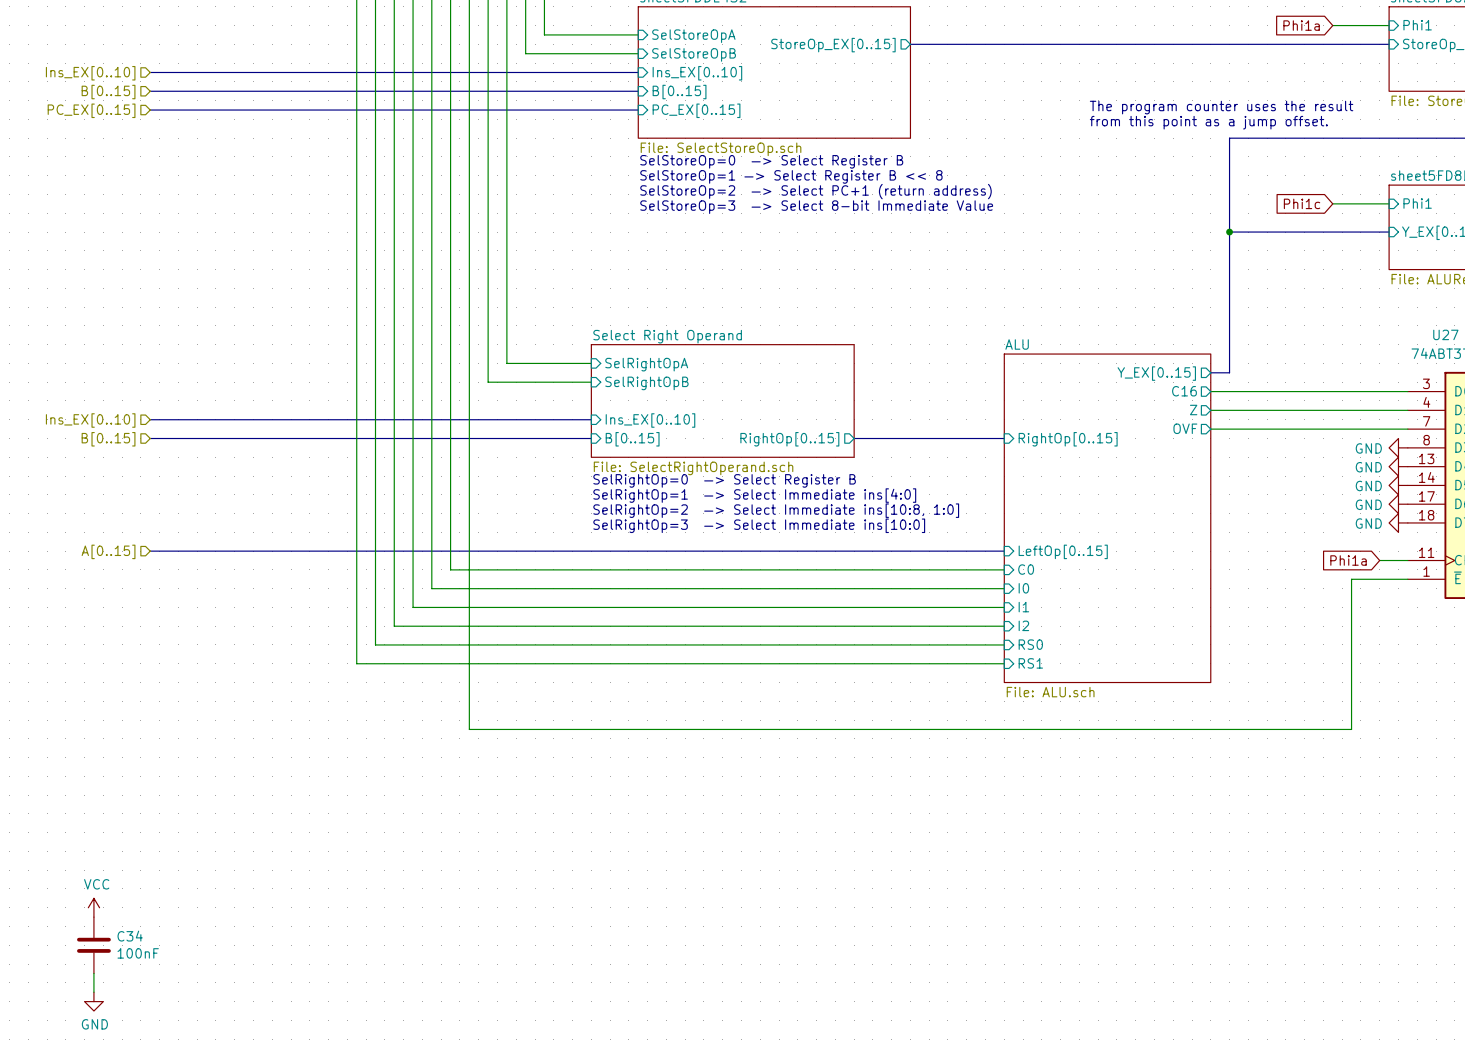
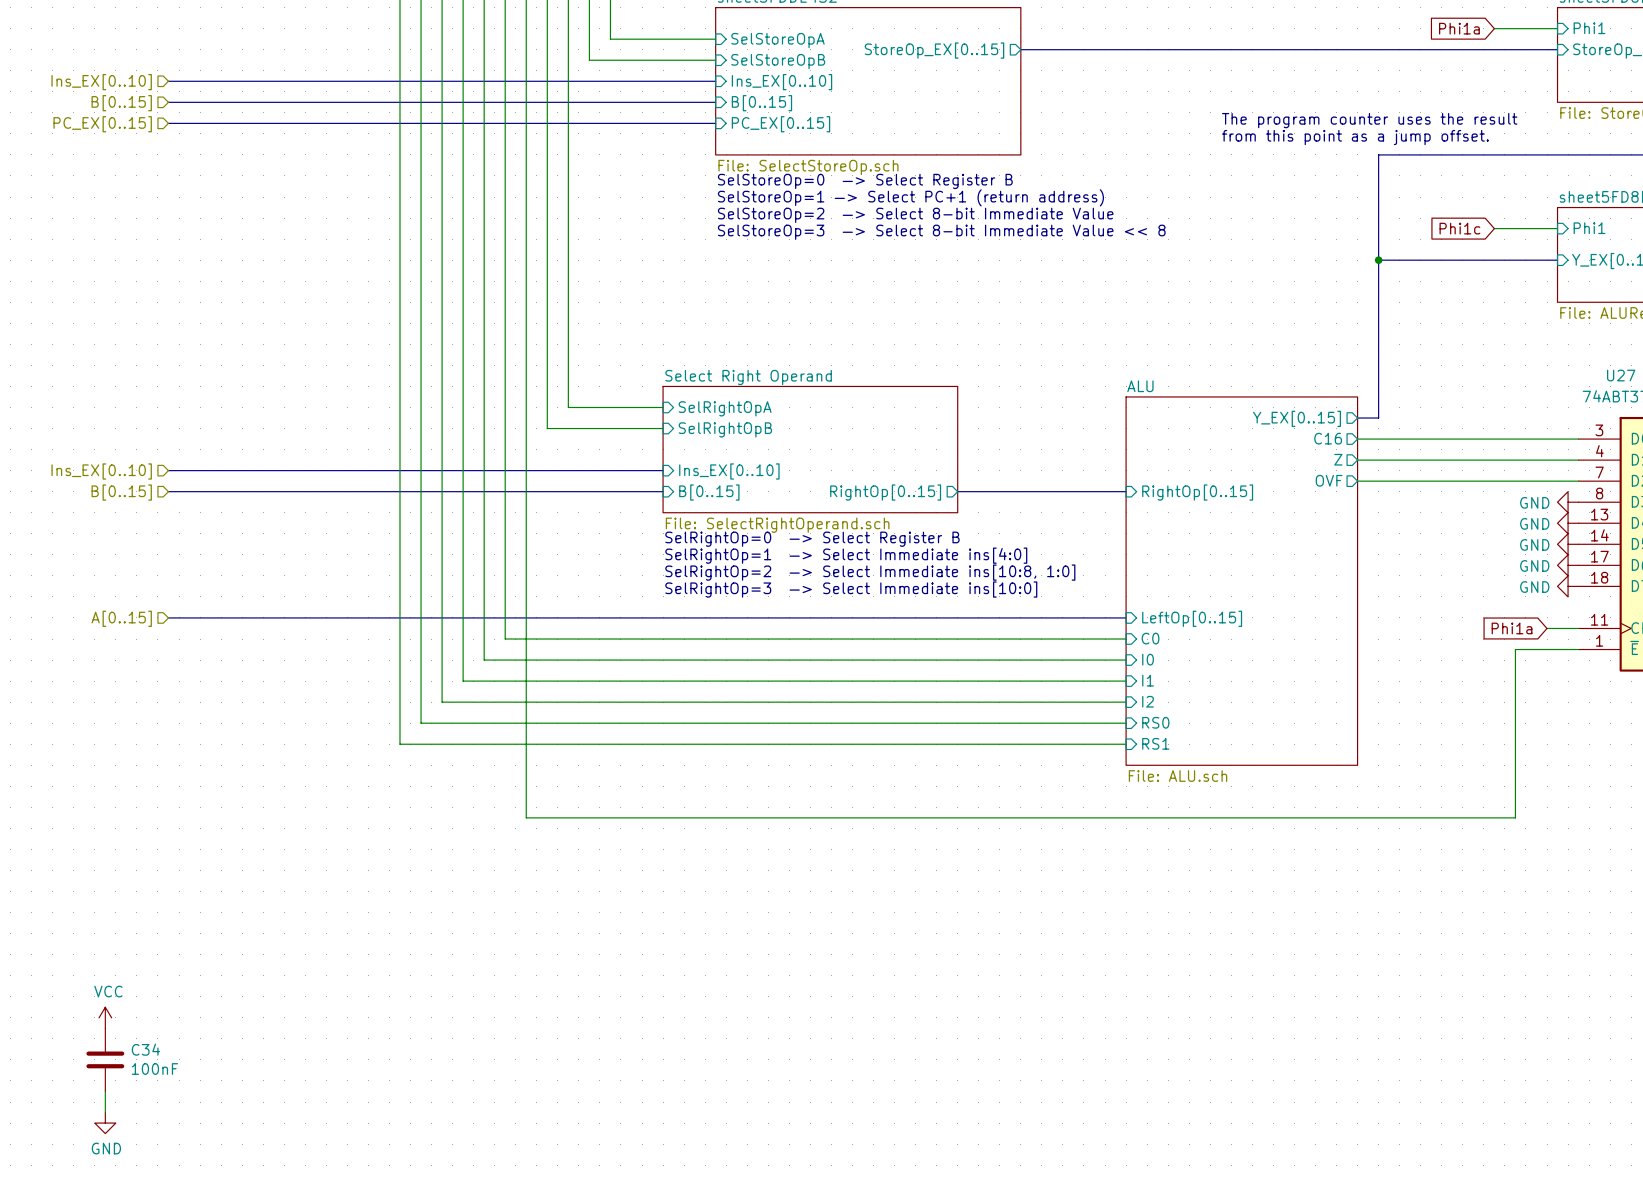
text: SelStoreOp=1 —> Select Register B << 8 (791, 176) -> SelStoreOp=1 —> Select PC+1 (return address) (910, 197)
text: SelStoreOp=2 —> Select PC+1 (return address) (816, 191) -> SelStoreOp=2 —> Select 8-bit Immediate Value (915, 215)
text: SelStoreOp=3 —> Select 8-bit Immediate Value (816, 207) -> SelStoreOp=3 —> Select 8-bit Immediate Value << 8 (941, 232)

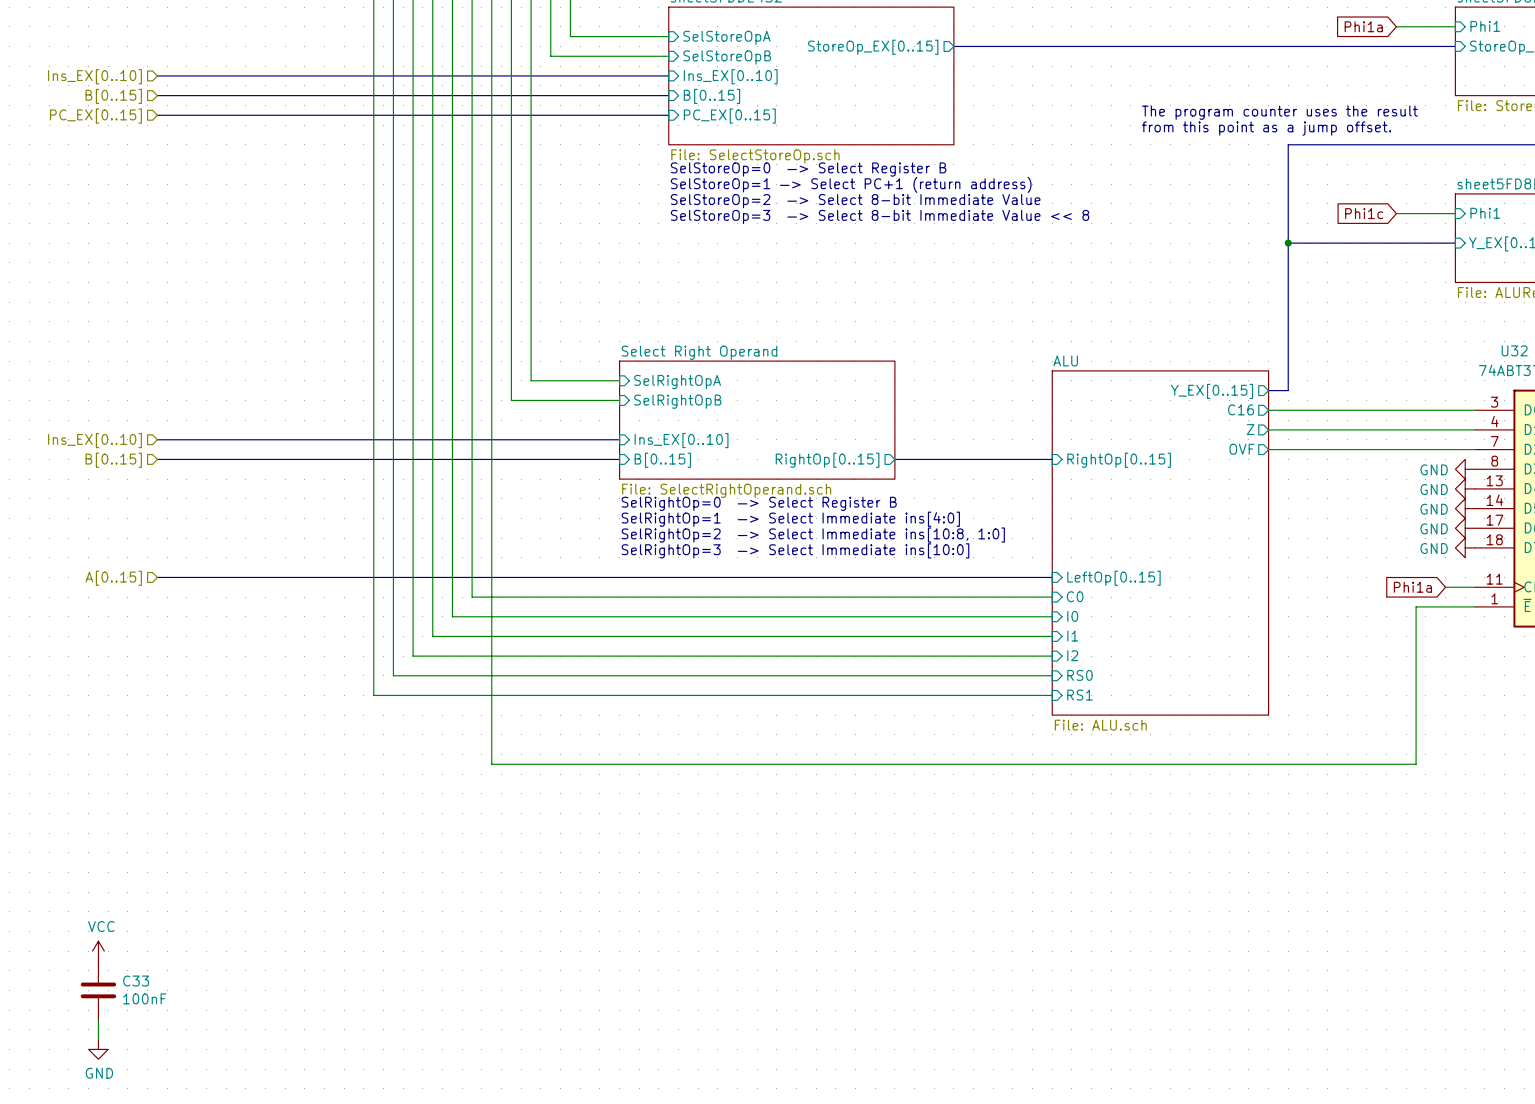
U27 name: U27 (1621, 375) -> U32 (1514, 350)
C34 name: C34 (145, 1049) -> C33 (136, 981)

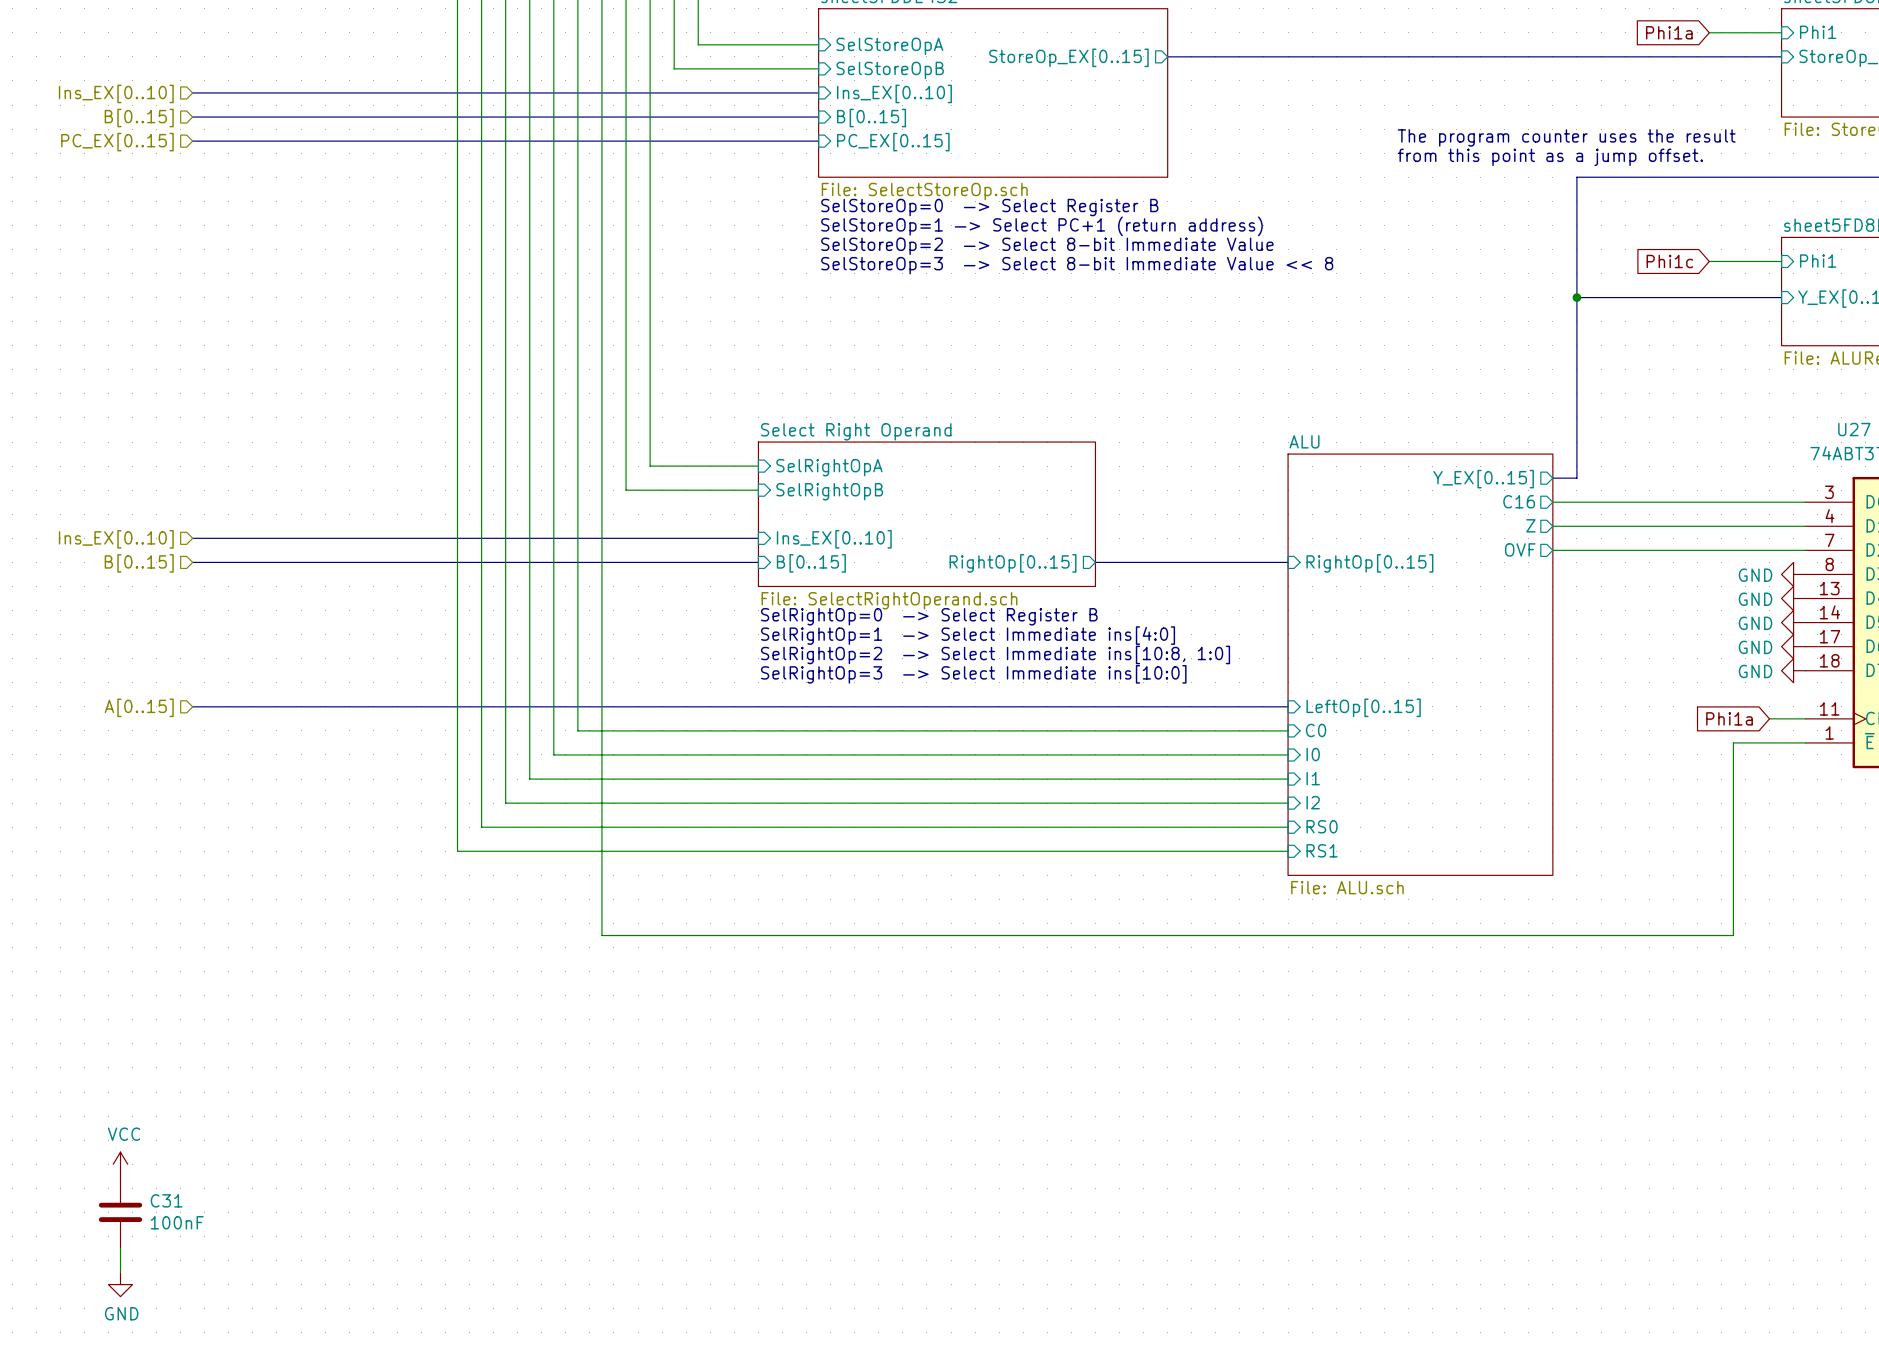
U32 name: U32 (1514, 350) -> U27 (1854, 429)
C33 name: C33 (136, 981) -> C31 (166, 1200)

